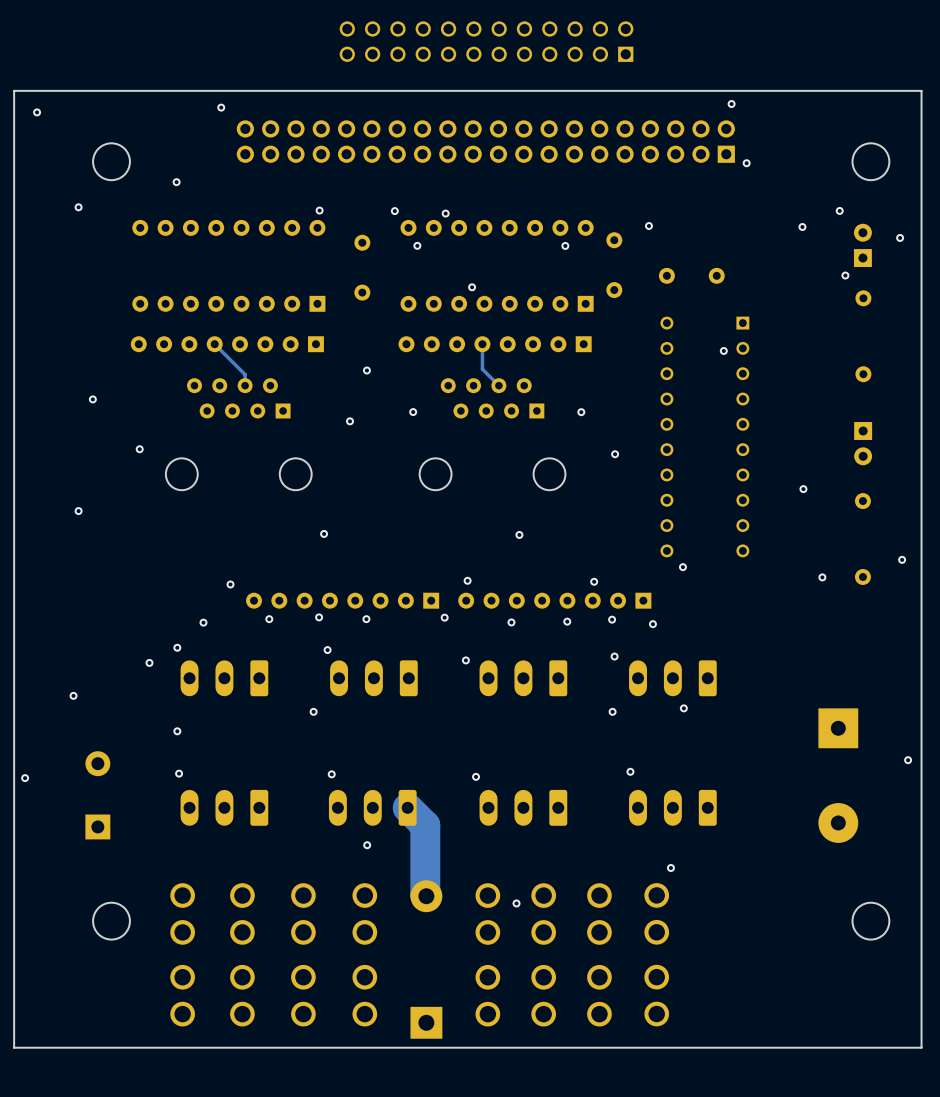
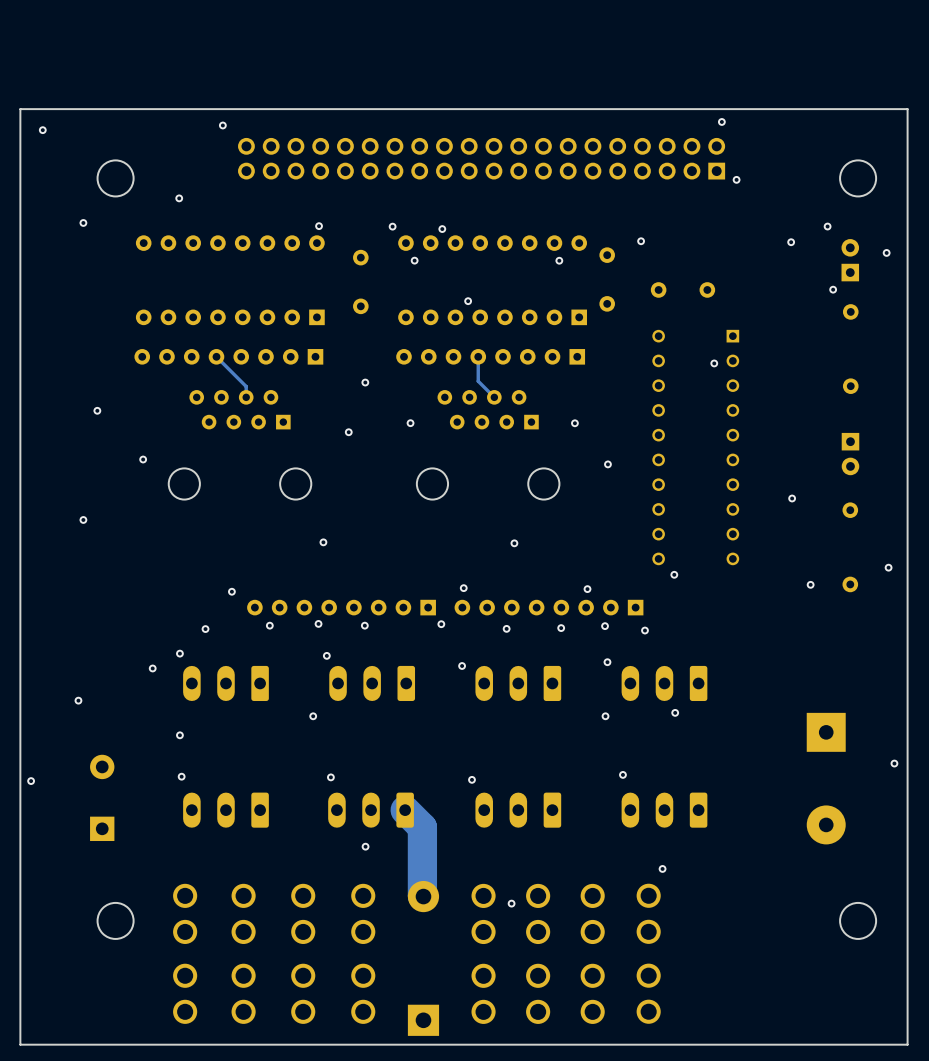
part: (486, 41) -> none

